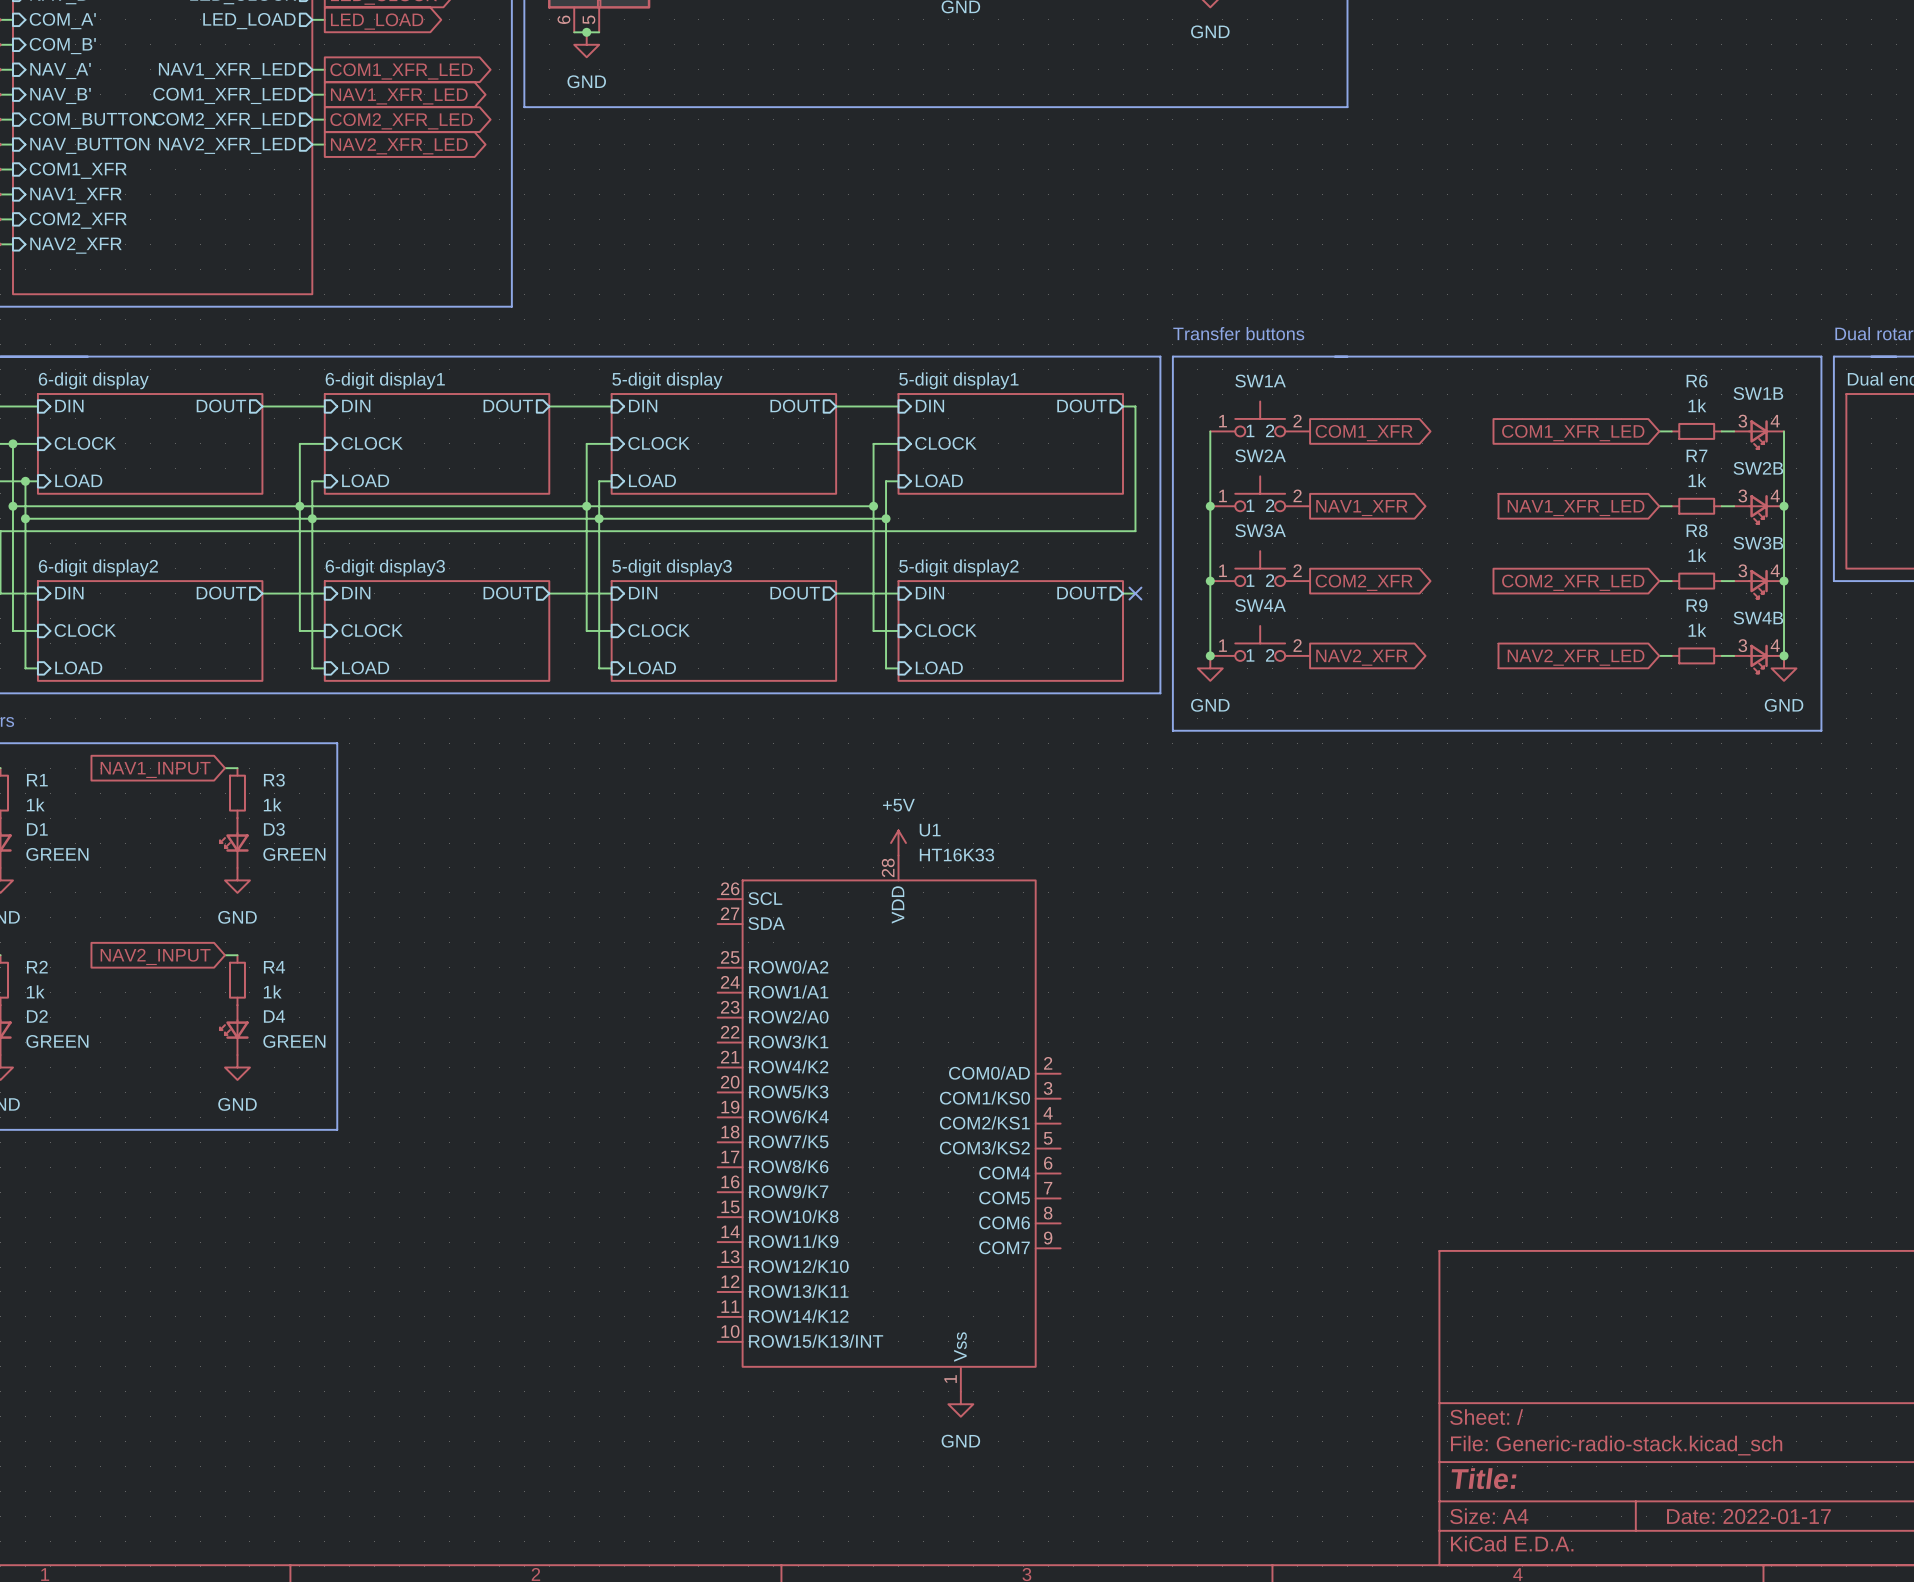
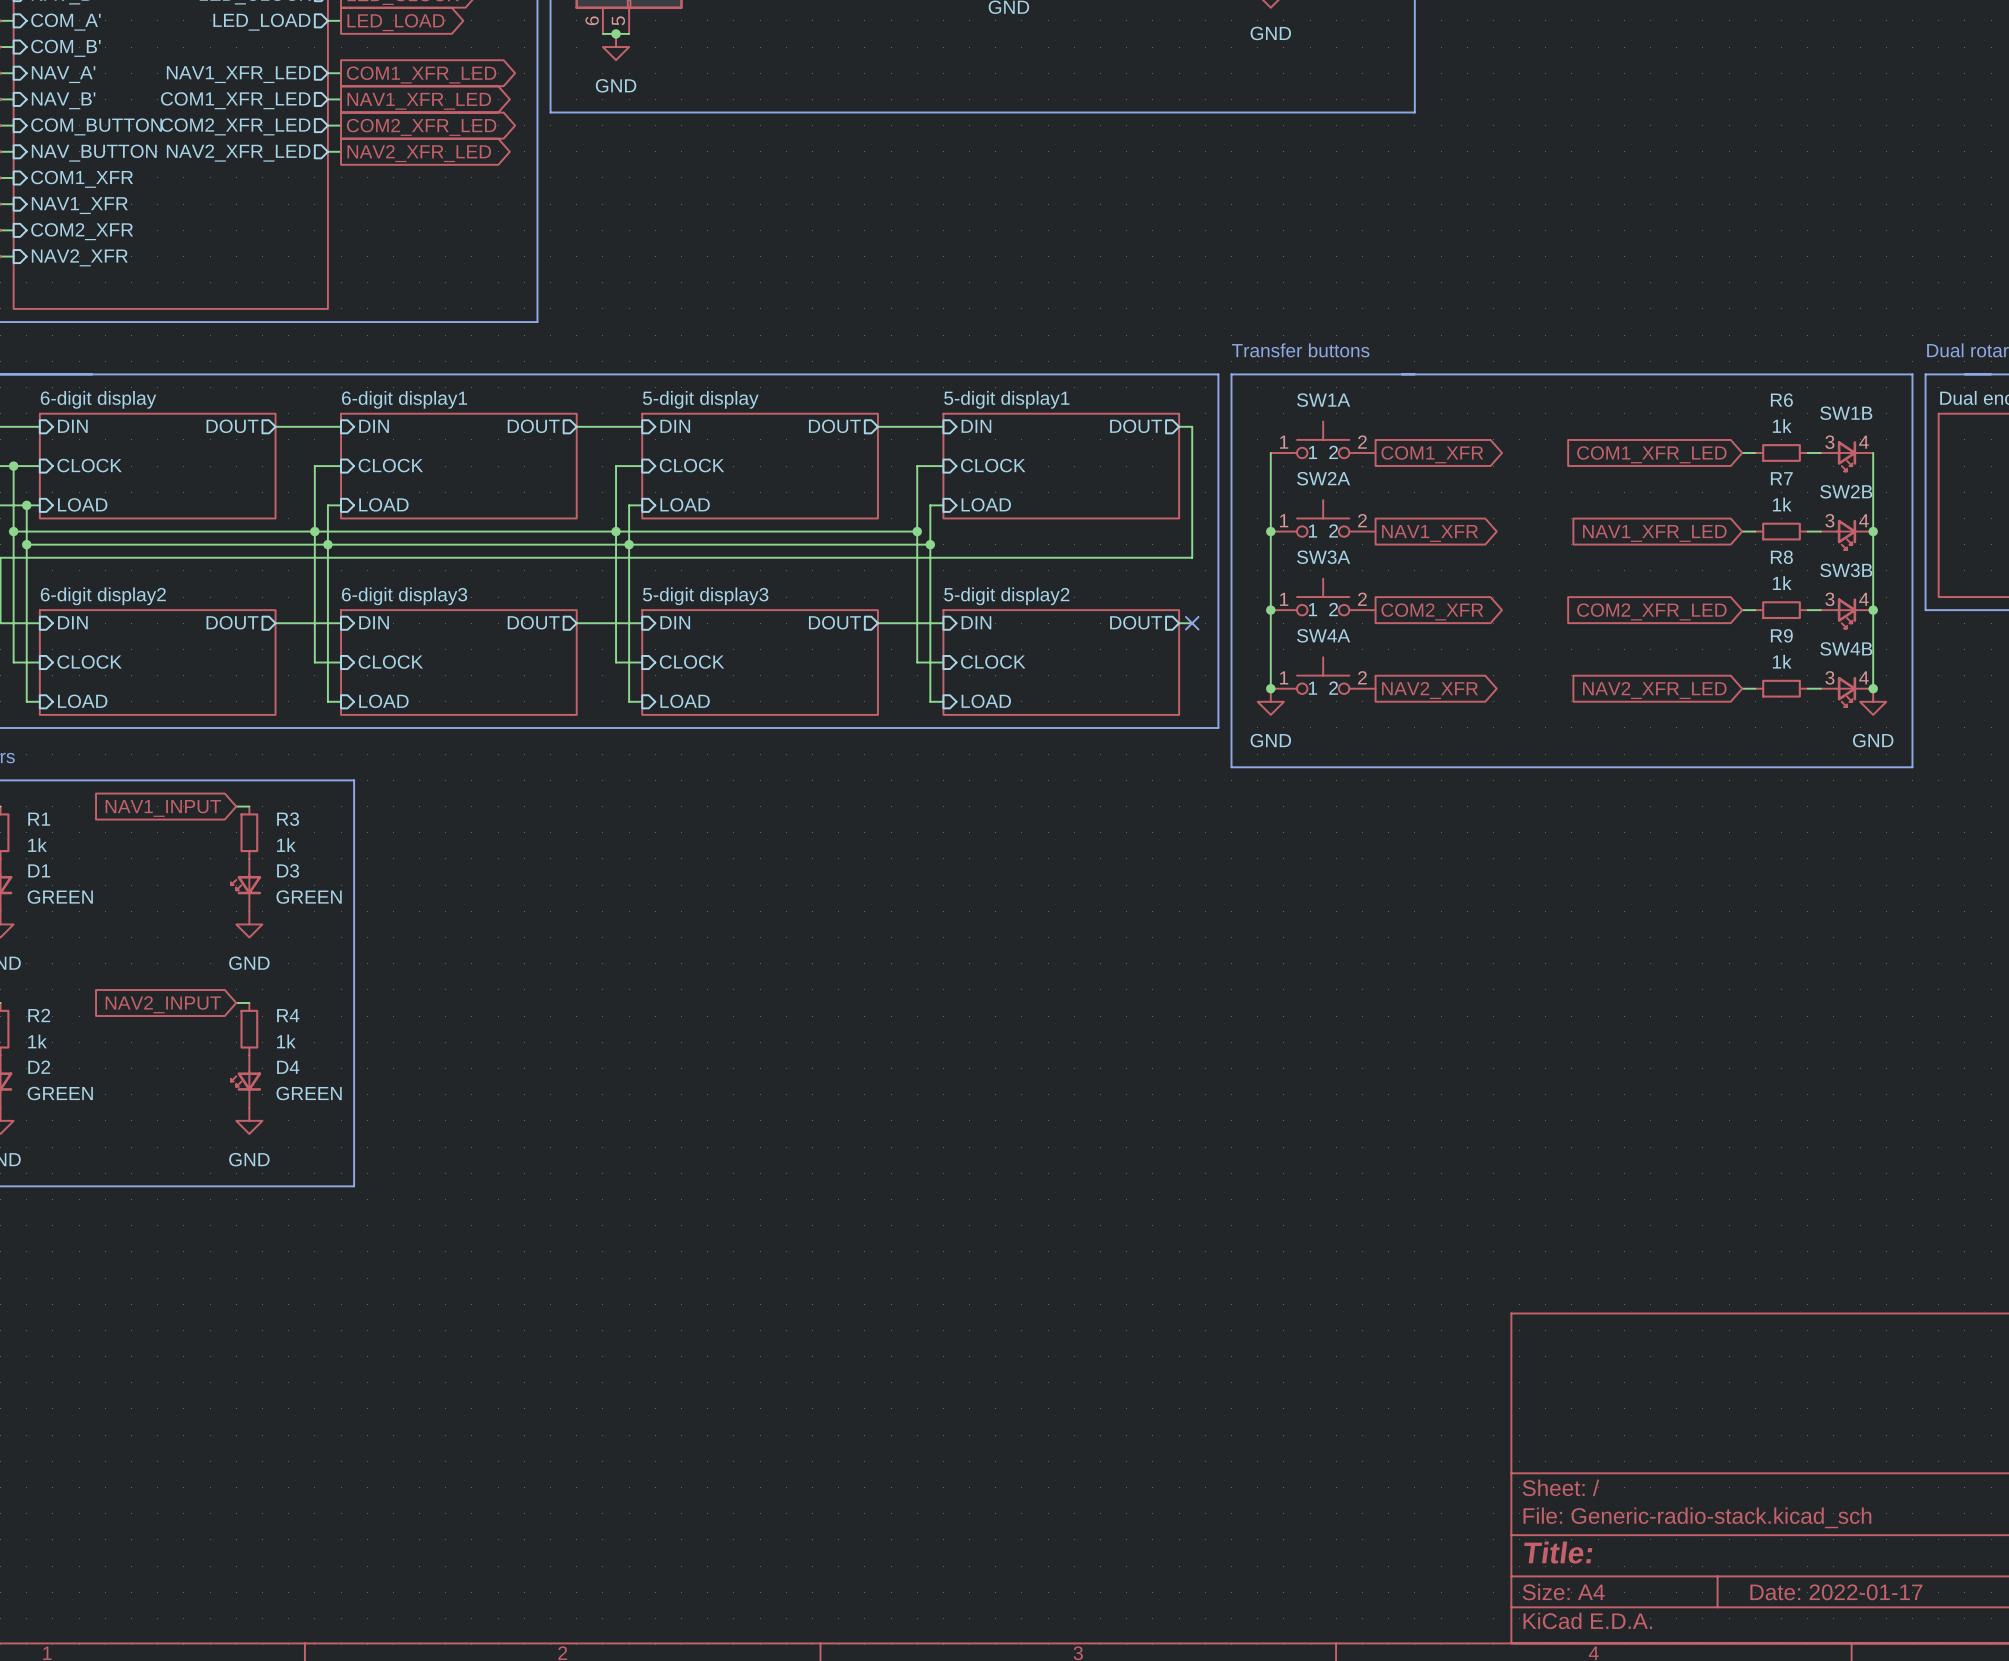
power symbol: +5V (898, 843) -> none
U1: HT16K33 (889, 1123) -> none
power symbol: GND (960, 1404) -> none

